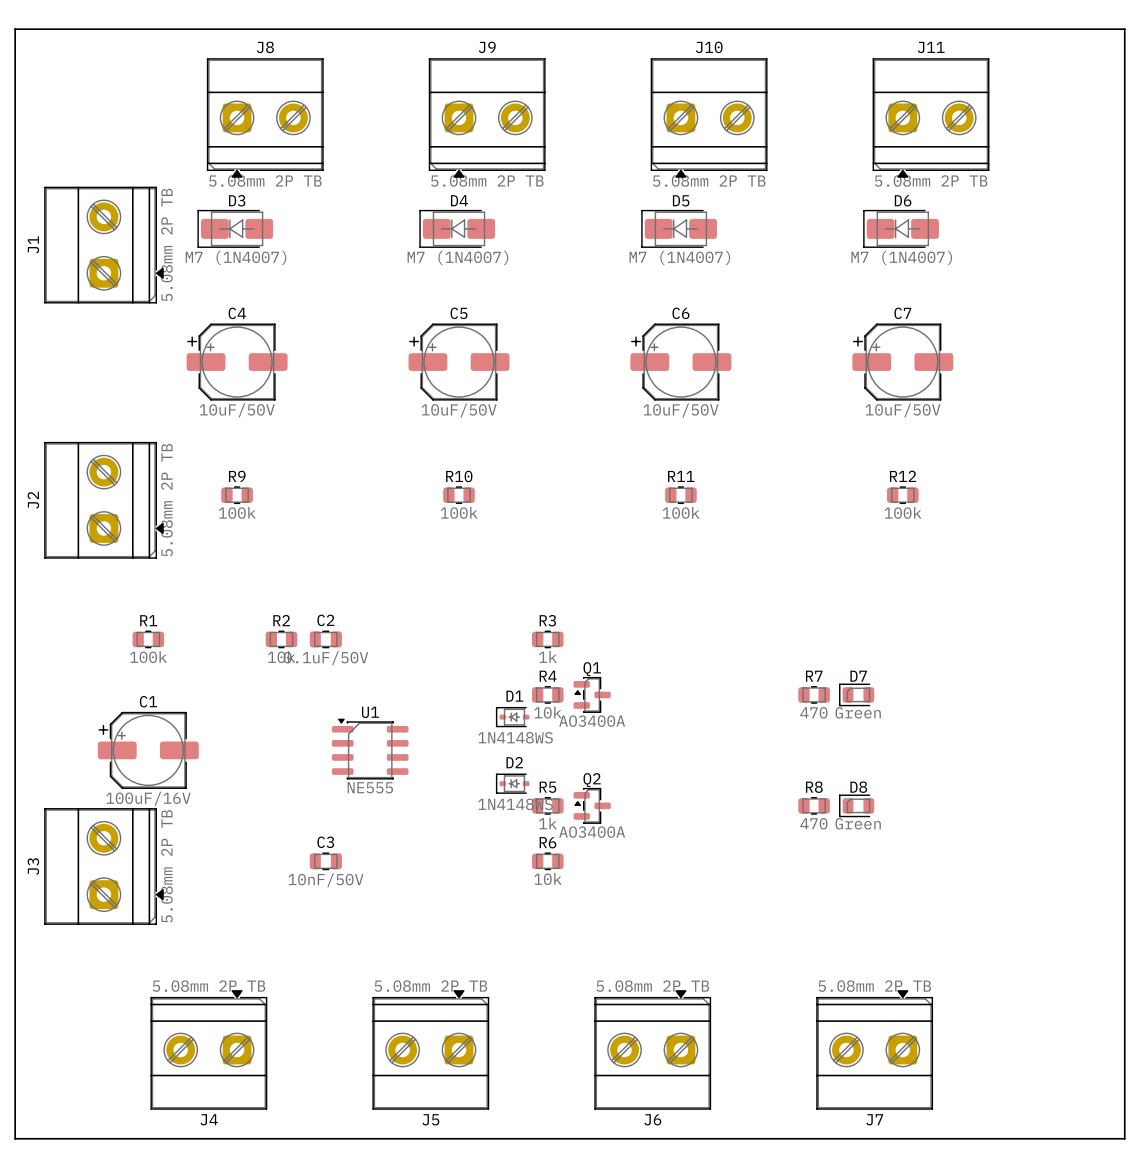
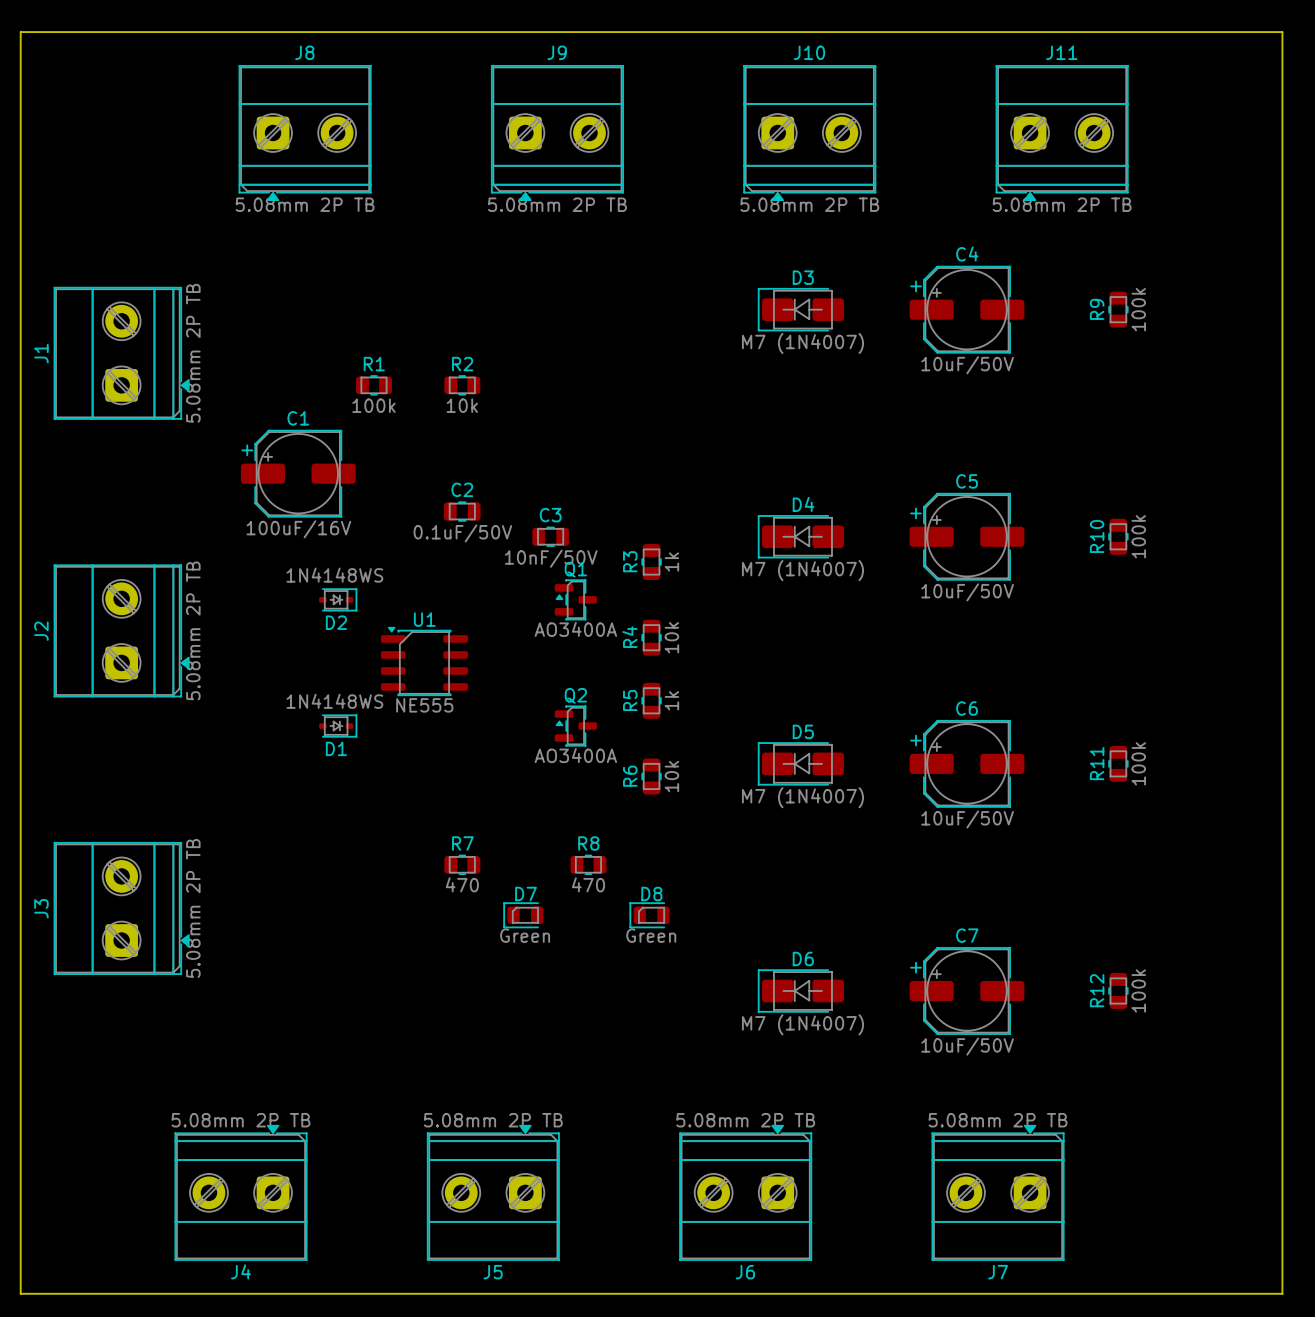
D3 position: (235, 228) -> (800, 309)
D4 position: (457, 228) -> (800, 536)
D5 position: (679, 228) -> (800, 763)
D6 position: (901, 228) -> (800, 990)
J1 position: (103, 245) -> (121, 353)
C7 footprint: [852, 323, 954, 401] -> [909, 947, 1025, 1035]
C4 position: (237, 362) -> (967, 309)
C5 position: (458, 362) -> (967, 536)
C6 position: (680, 362) -> (967, 763)
R9 name position: R9 (237, 476) -> R9 (1097, 309)
R10 name position: R10 (459, 476) -> R10 (1097, 536)
R11 name position: R11 (681, 476) -> R11 (1097, 763)
R12 name position: R12 (903, 476) -> R12 (1097, 990)
R9 rotation: 0° (237, 495) -> 90° clockwise (1118, 309)
R9 position: (237, 495) -> (1118, 309)
R10 rotation: 0° (458, 495) -> 90° clockwise (1118, 536)
R10 position: (458, 495) -> (1118, 536)
R11 rotation: 0° (680, 495) -> 90° clockwise (1118, 763)
R11 position: (680, 495) -> (1118, 763)
R12 rotation: 0° (902, 495) -> 90° clockwise (1118, 990)
R12 position: (902, 495) -> (1118, 990)
J2 position: (103, 500) -> (121, 630)
R9 value position: 100k (237, 512) -> 100k (1138, 309)
R10 value position: 100k (459, 512) -> 100k (1138, 536)
R11 value position: 100k (681, 512) -> 100k (1138, 763)
R12 value position: 100k (903, 512) -> 100k (1138, 990)
R3 name position: R3 (547, 620) -> R3 (630, 561)
R1 position: (148, 639) -> (373, 385)
R2 position: (281, 639) -> (462, 385)
C2 position: (325, 639) -> (462, 511)
R3 rotation: 0° (547, 639) -> 90° clockwise (651, 562)
R3 position: (547, 639) -> (651, 562)
R3 value position: 1k (547, 657) -> 1k (671, 562)
R4 name position: R4 (548, 676) -> R4 (629, 637)
R4 rotation: 0° (547, 694) -> 90° clockwise (651, 637)
R4 position: (547, 694) -> (651, 637)
Q1 position: (592, 694) -> (575, 599)
R7 position: (814, 694) -> (462, 864)
D7 position: (856, 694) -> (523, 915)
R4 value position: 10k (547, 712) -> 10k (671, 637)
D1 rotation: 0° (512, 717) -> 180° (338, 726)
D1 position: (512, 717) -> (338, 726)
U1 position: (370, 749) -> (424, 661)
C1 position: (148, 750) -> (298, 473)
D2 rotation: 0° (512, 783) -> 180° (338, 599)
D2 position: (512, 783) -> (338, 599)
R5 name position: R5 (547, 787) -> R5 (630, 700)
R5 rotation: 0° (547, 805) -> 90° clockwise (651, 700)
R5 position: (547, 805) -> (651, 700)
Q2 position: (592, 805) -> (575, 726)
R8 position: (814, 805) -> (588, 864)
D8 position: (856, 805) -> (649, 915)
R5 value position: 1k (547, 823) -> 1k (671, 700)
R6 name position: R6 (547, 842) -> R6 (630, 776)
C3 position: (325, 861) -> (550, 536)
R6 rotation: 0° (547, 861) -> 90° clockwise (651, 776)
R6 position: (547, 861) -> (651, 776)
J3 position: (103, 866) -> (121, 908)
R6 value position: 10k (547, 879) -> 10k (671, 776)

